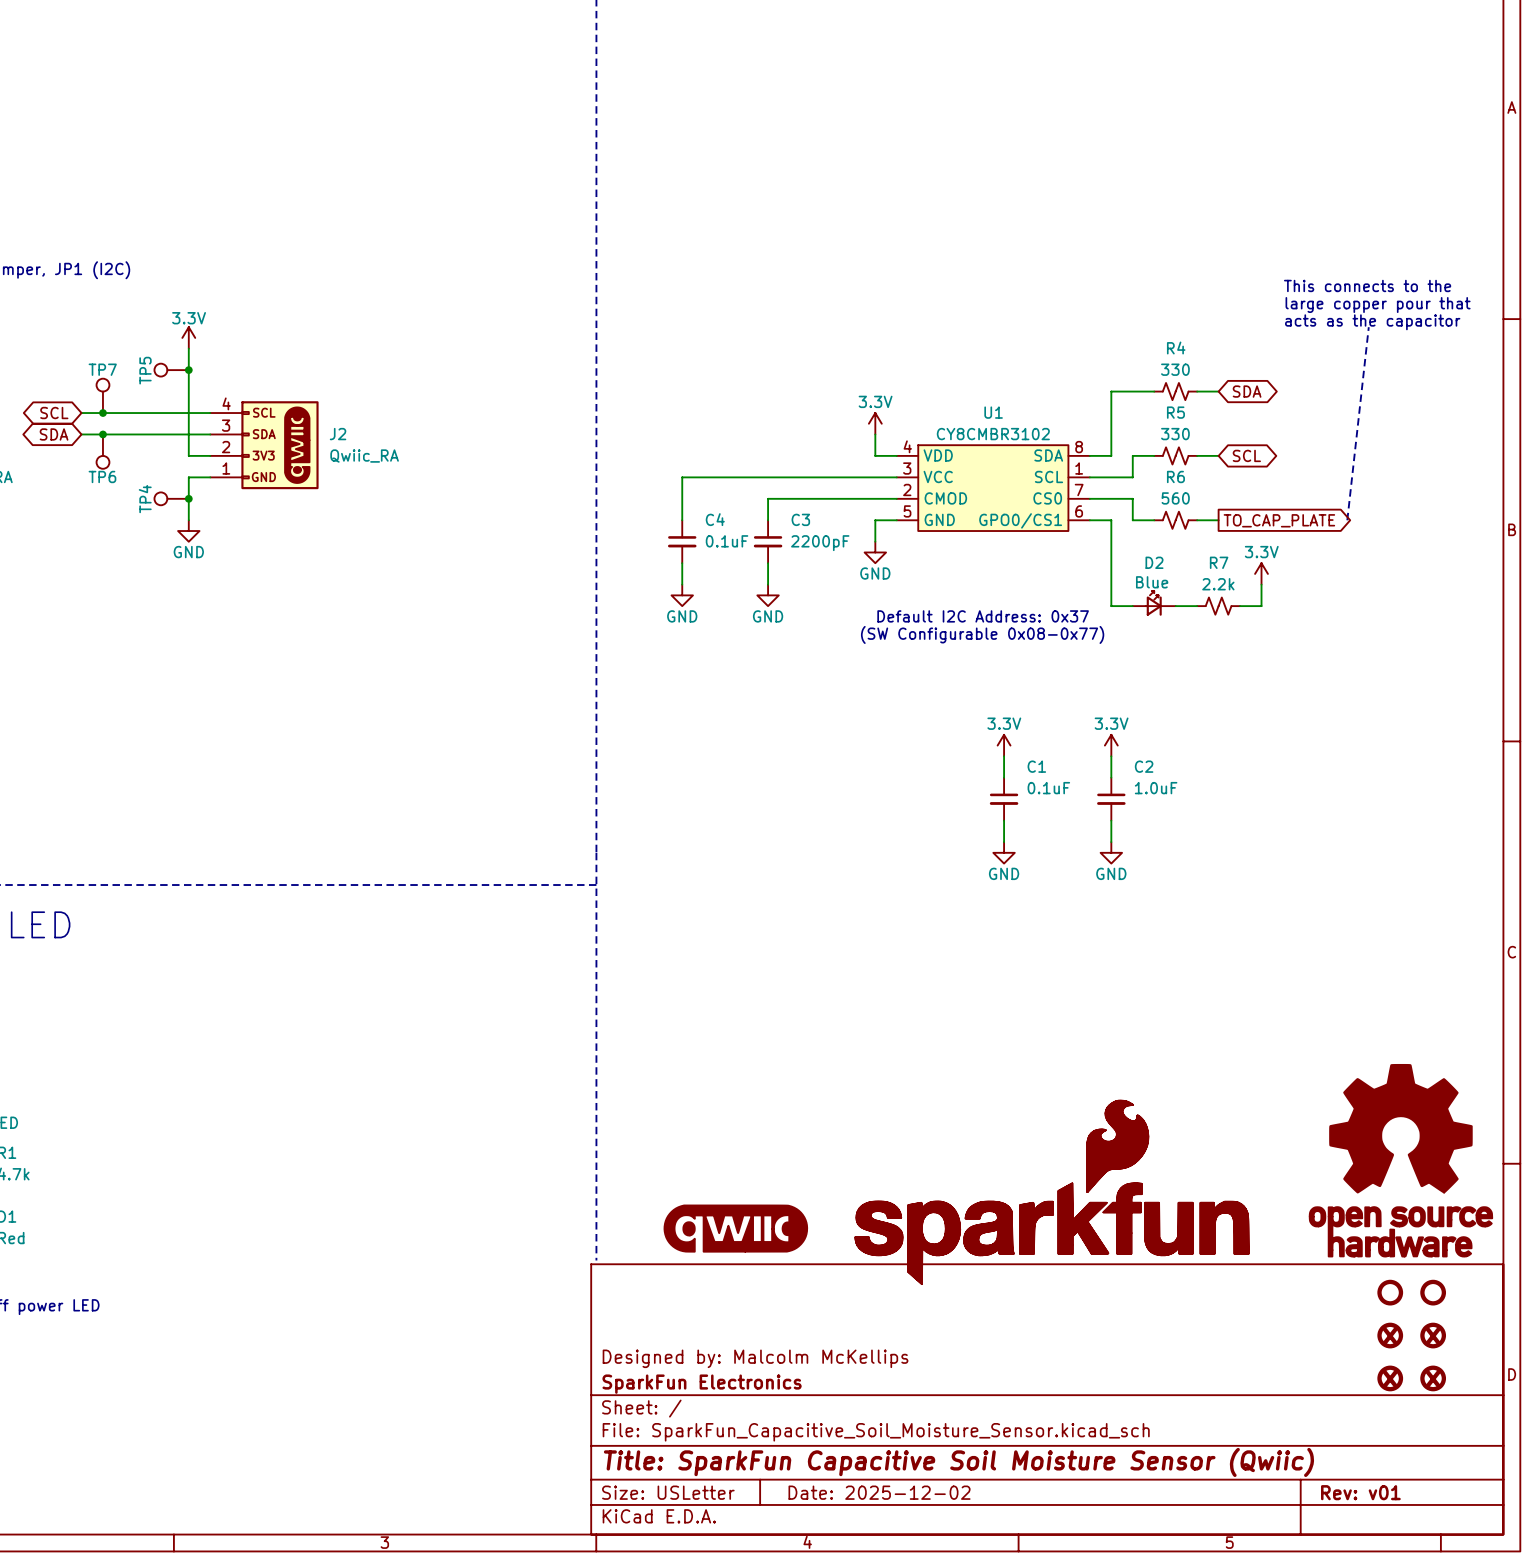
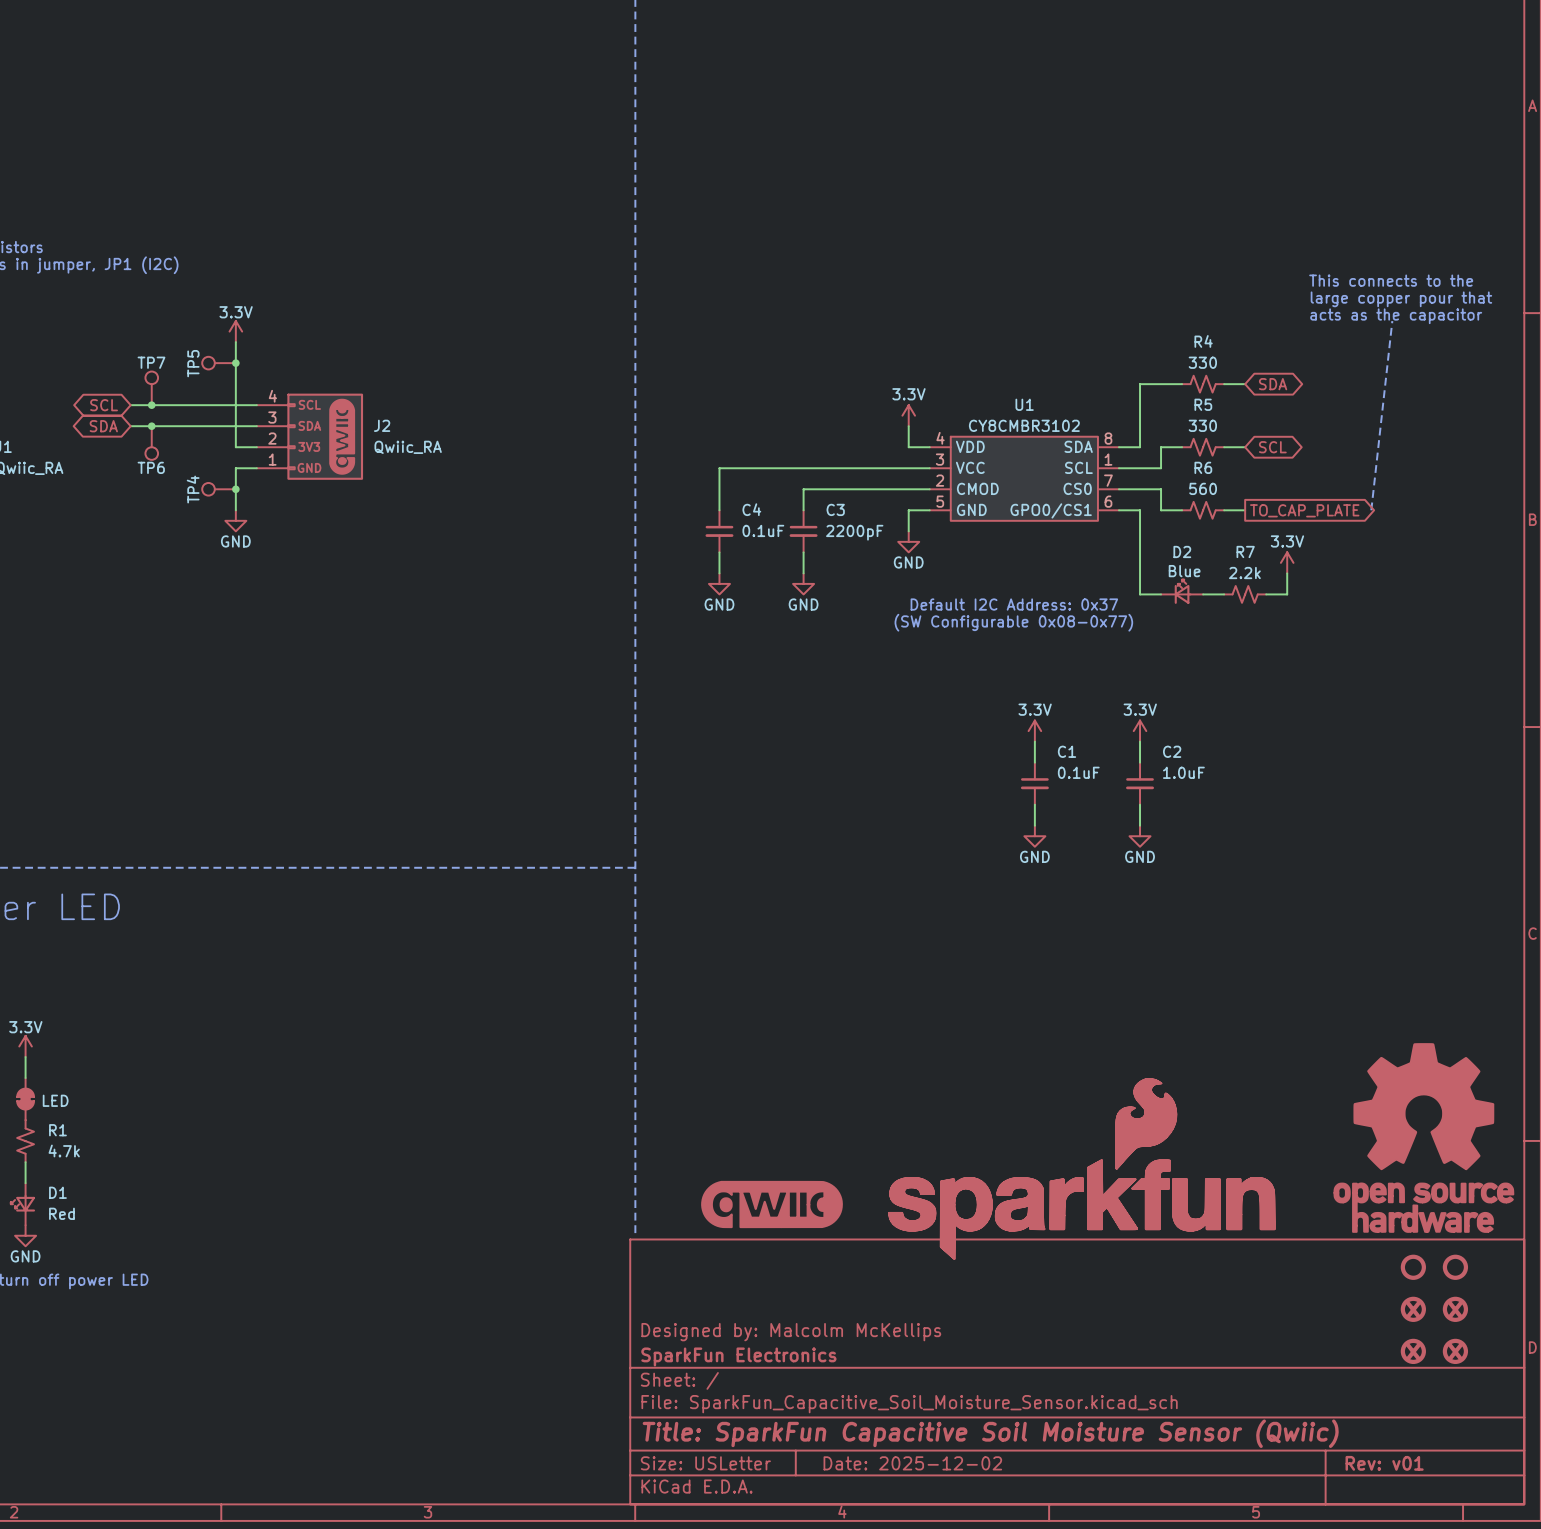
D2 flip: as is (1153, 603) -> left-right (1182, 591)

